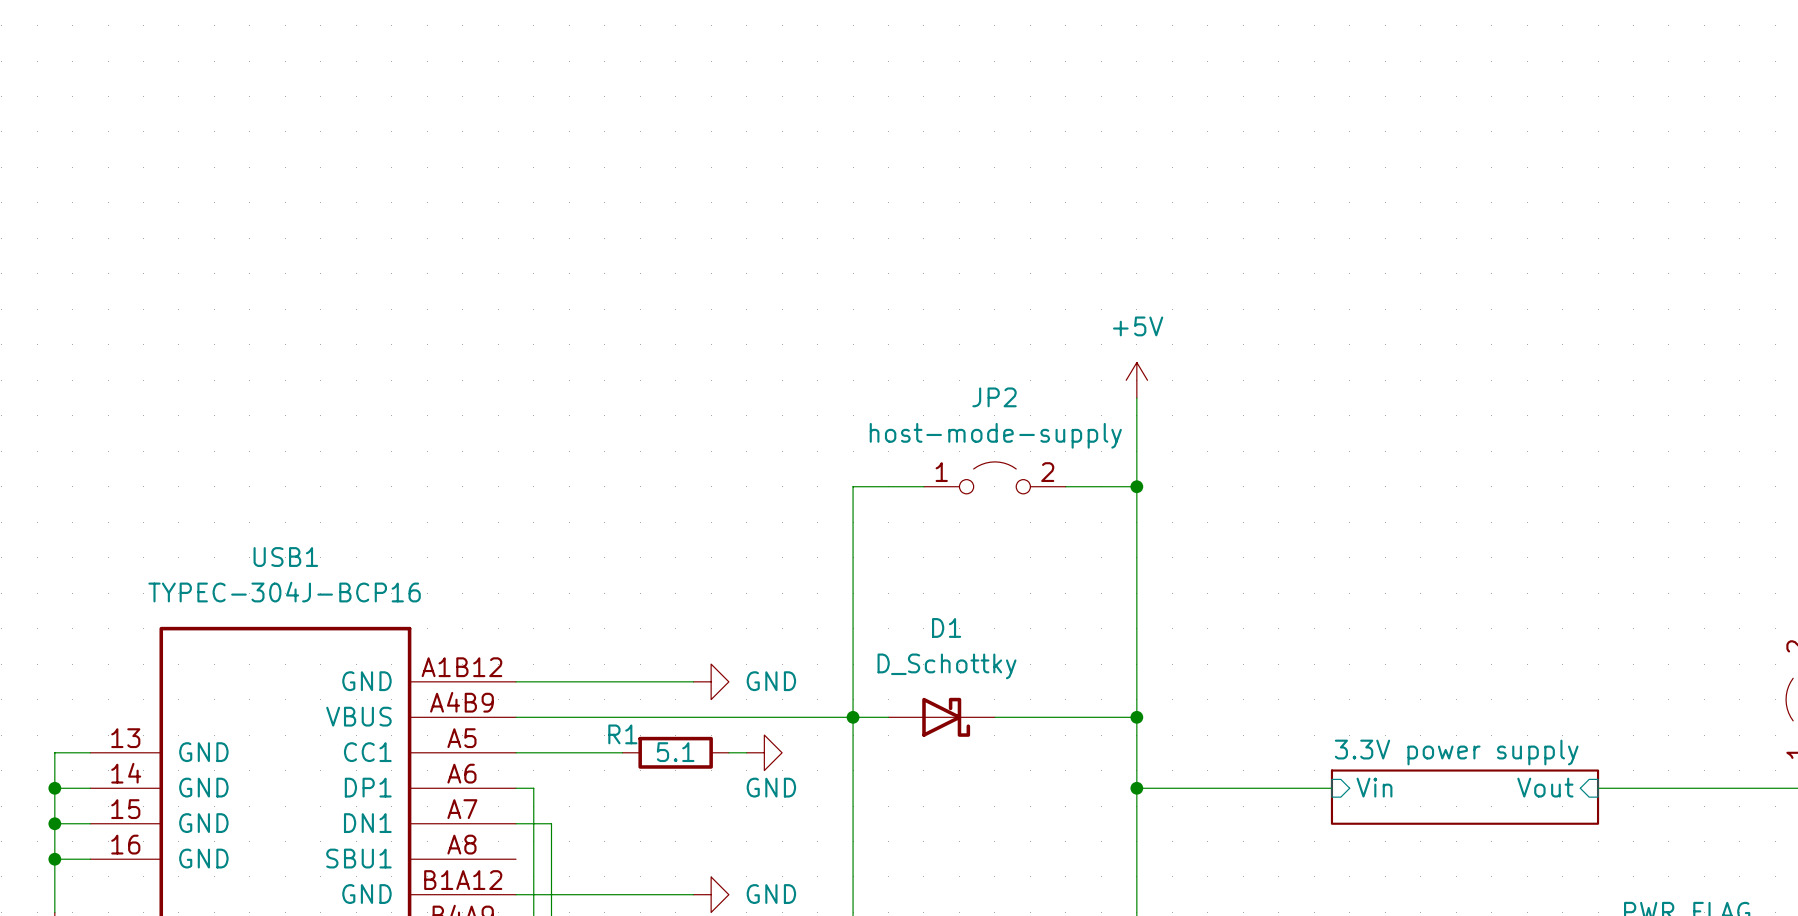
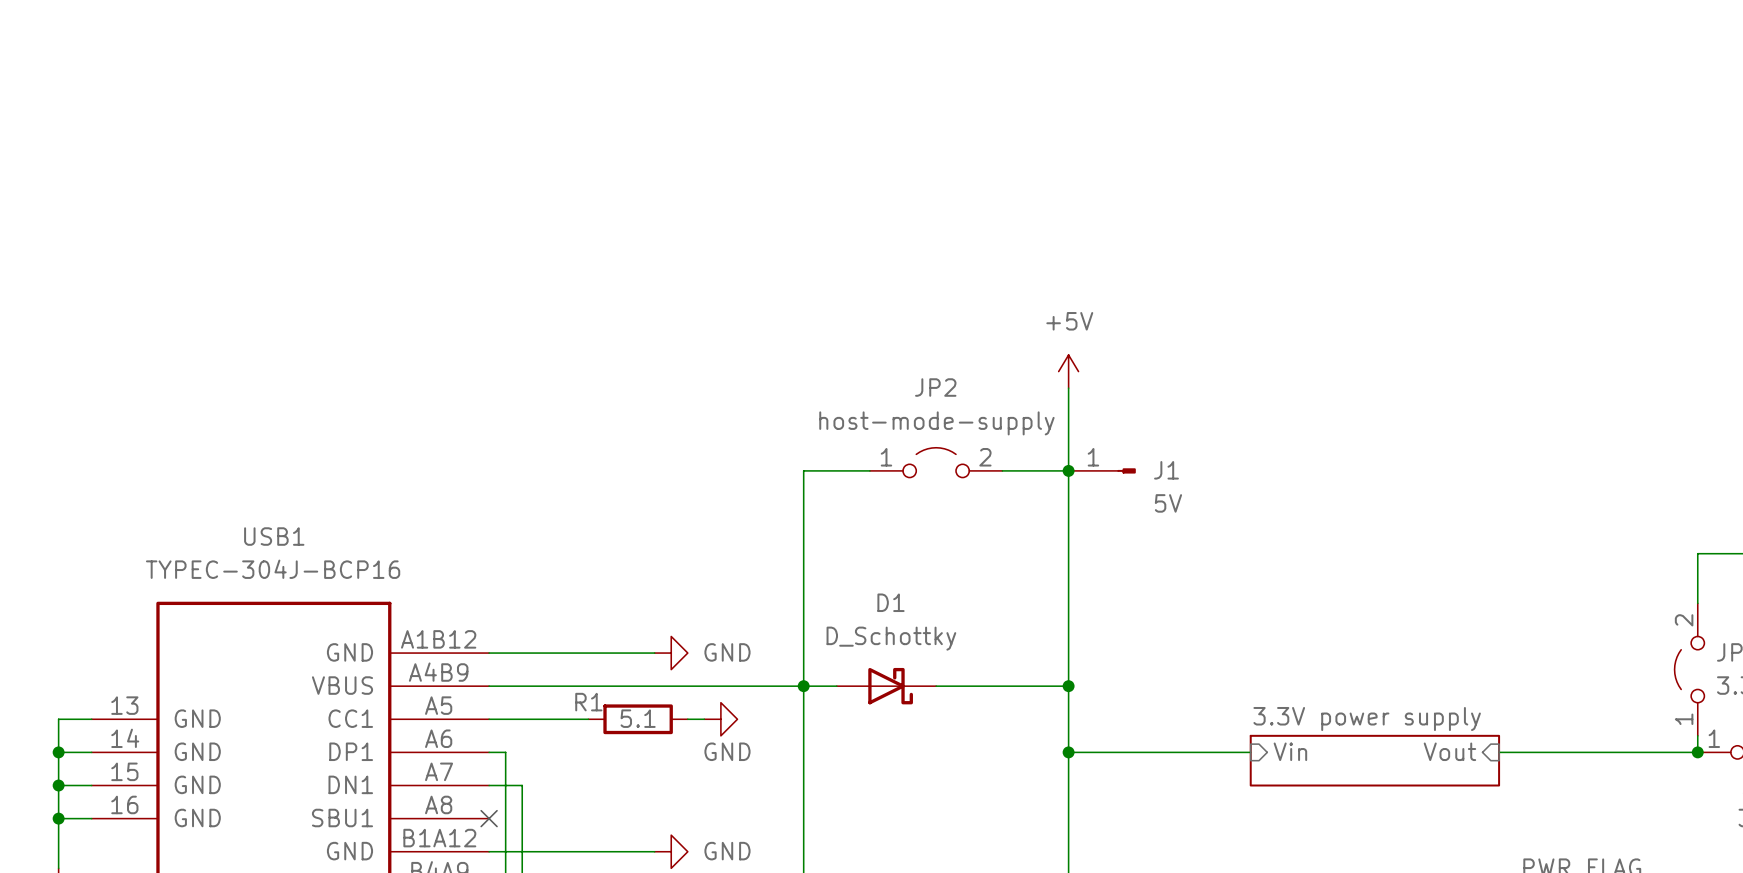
J1: none -> 5V (1102, 470)
no-connect mark: none -> (489, 818)

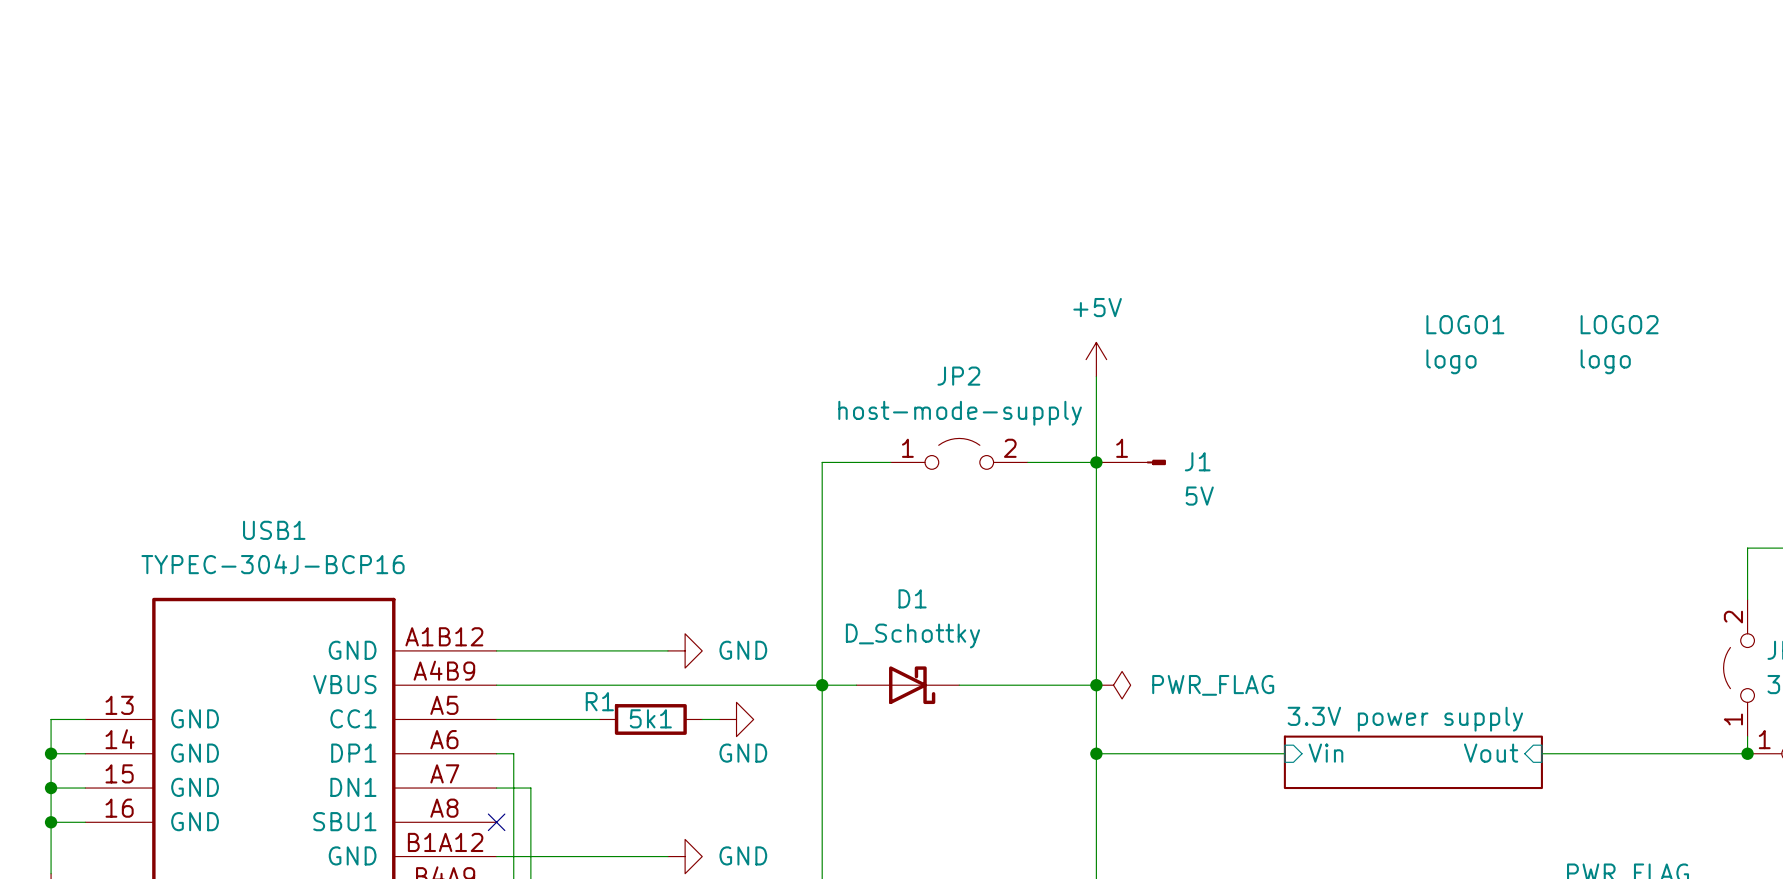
LOGO1: none -> logo (1465, 344)
LOGO2: none -> logo (1619, 344)
power symbol: none -> PWR_FLAG (1113, 685)
R1 value: 5.1 (638, 718) -> 5k1 (650, 718)

